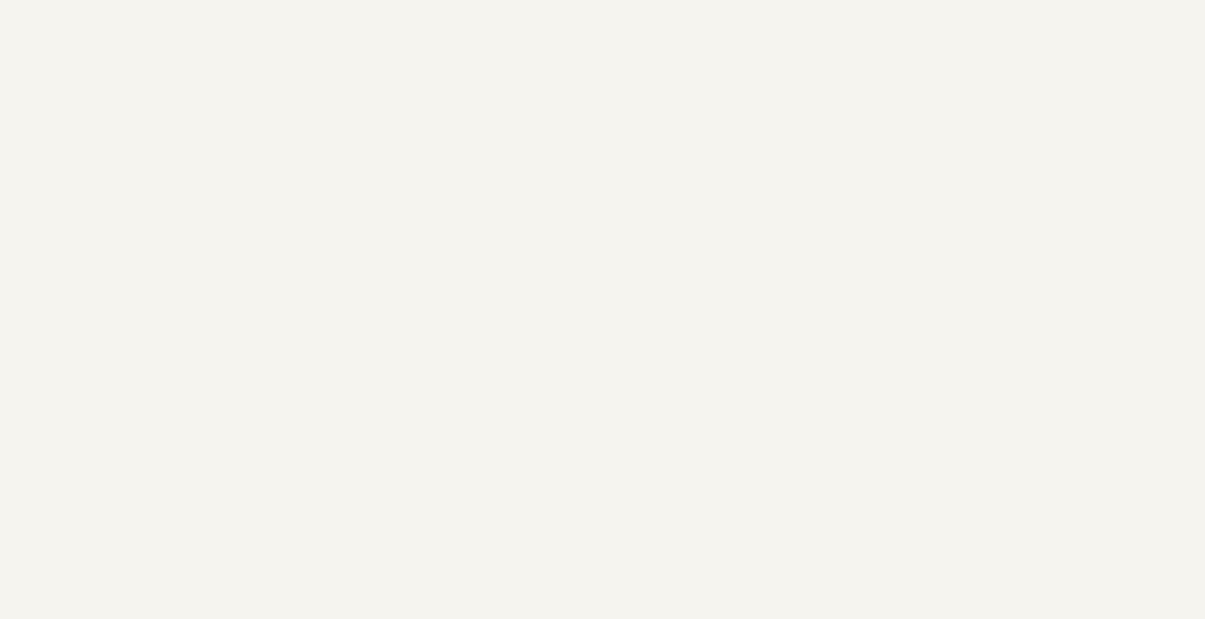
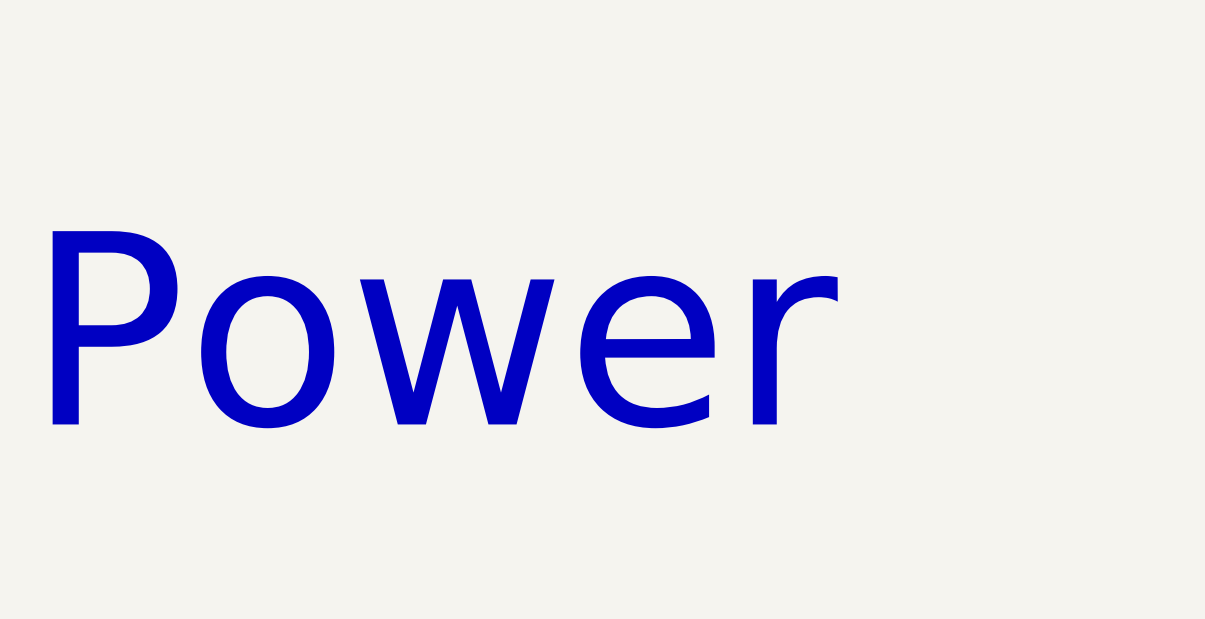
text: none -> Power (445, 329)

